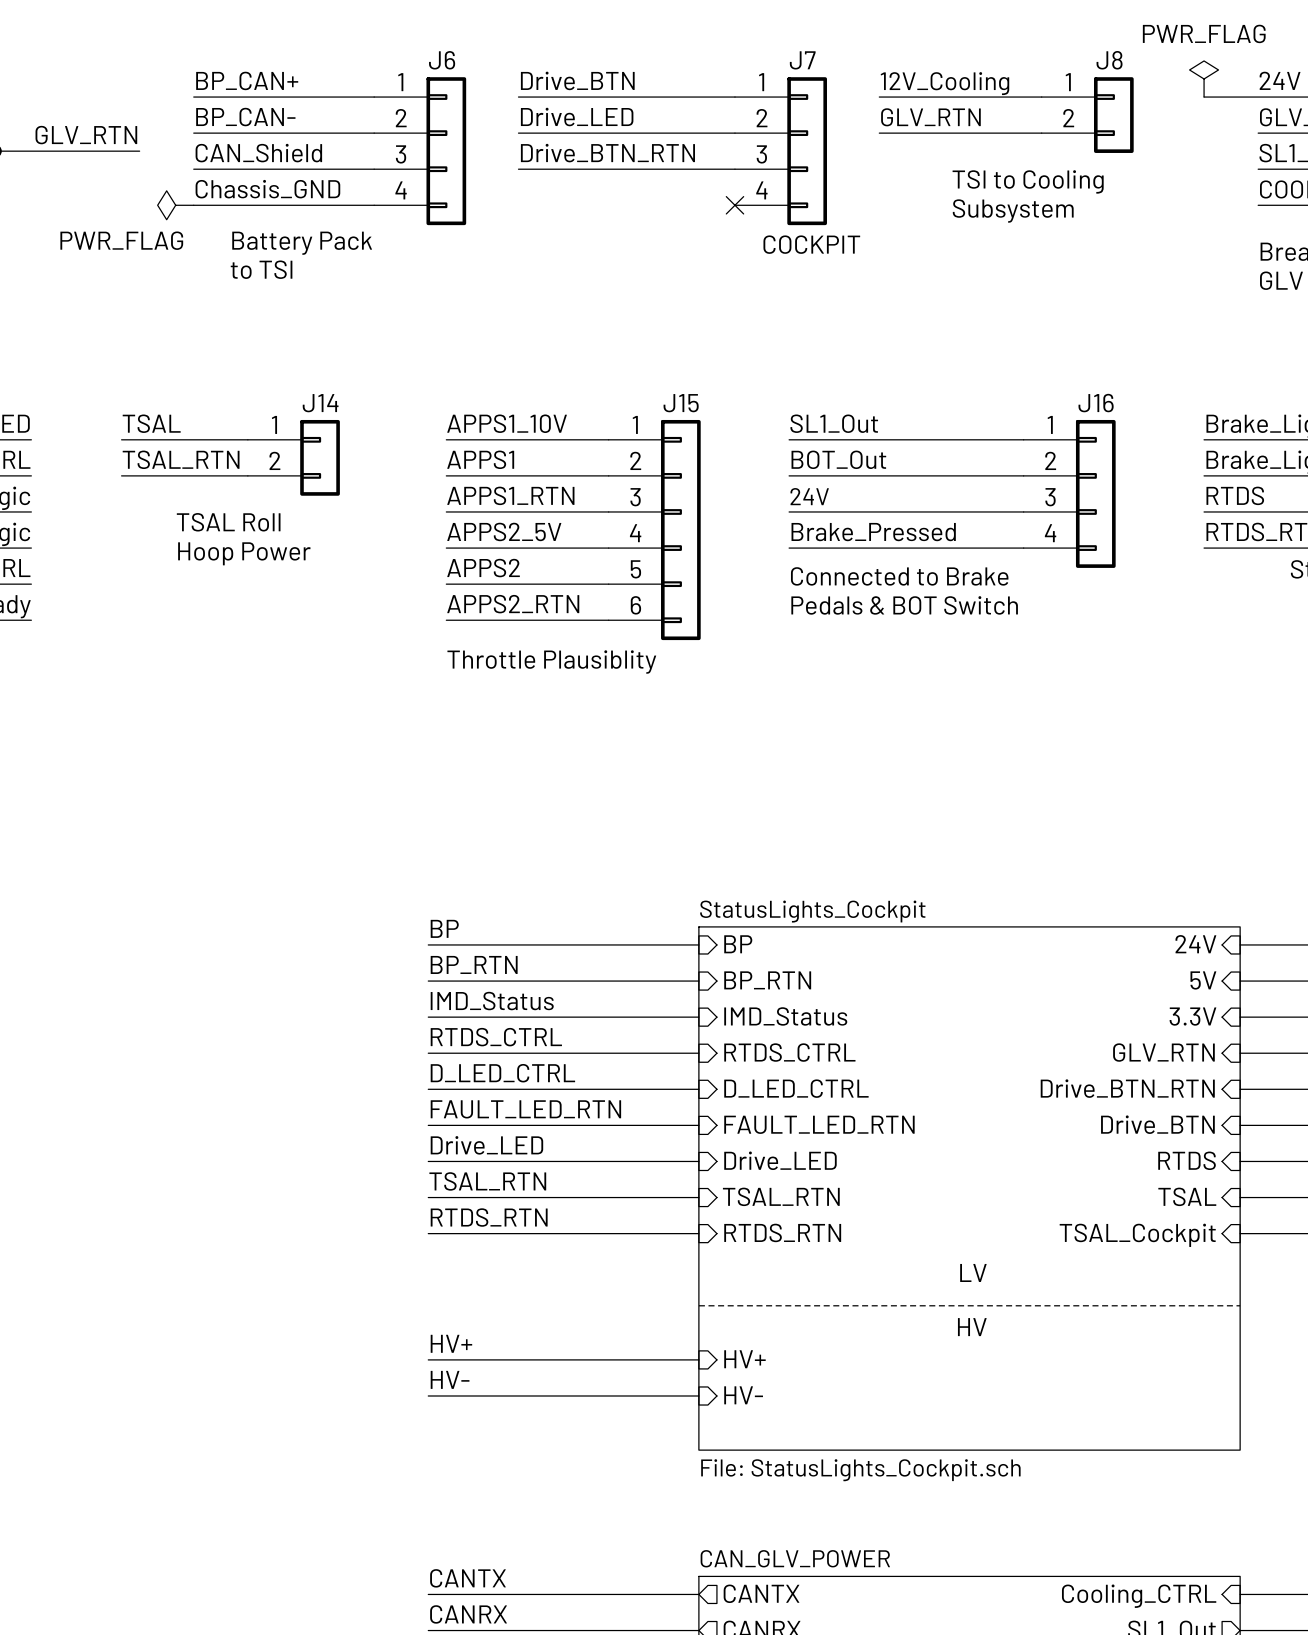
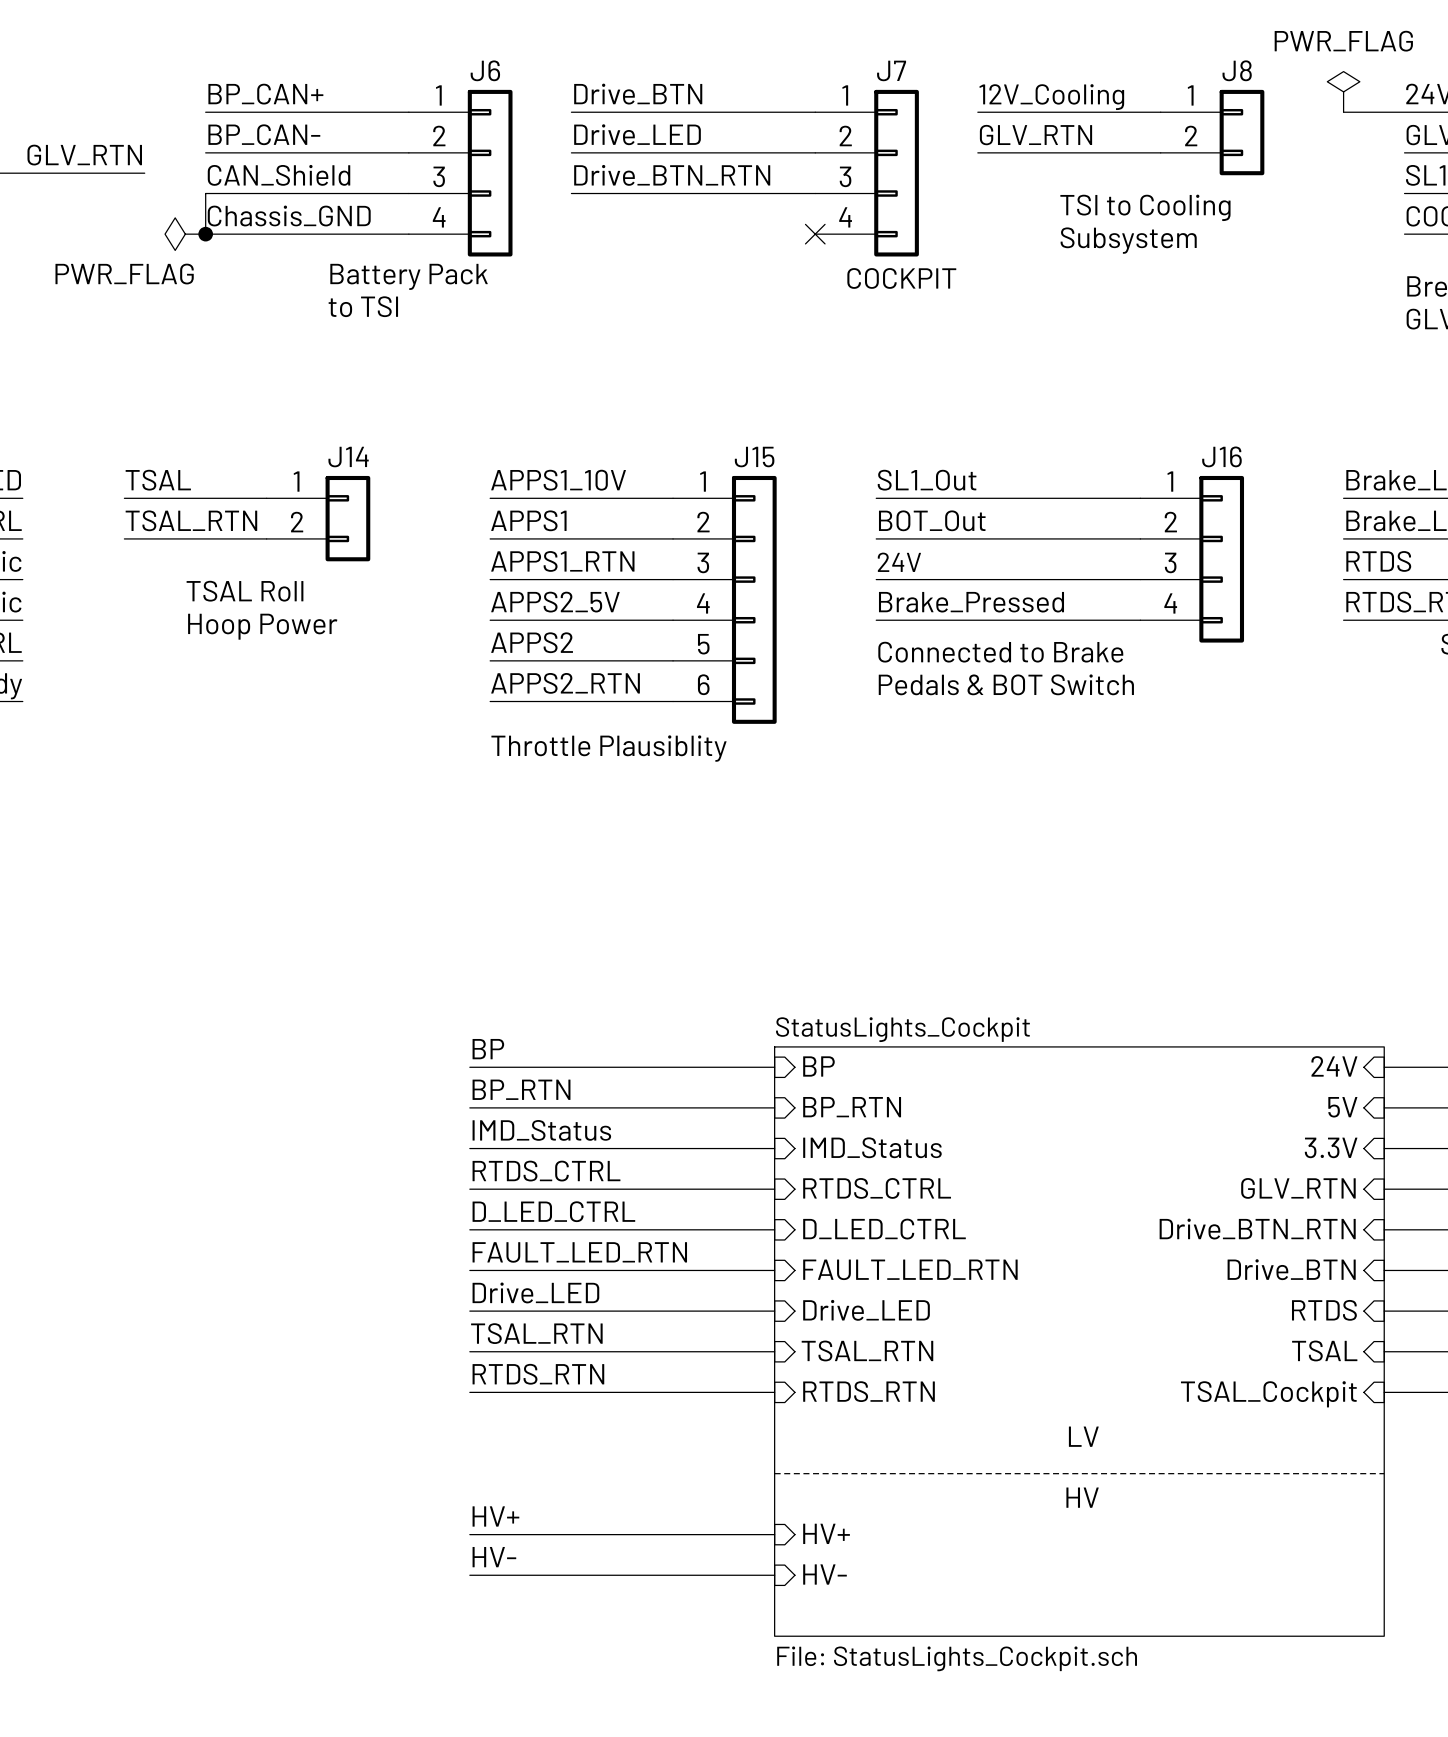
wire: none -> (205, 193) (205, 234)
junction: none -> (205, 234)
text position: Battery Pack (302, 243) -> Battery Pack (409, 276)
text position: to TSI (261, 269) -> to TSI (363, 306)

